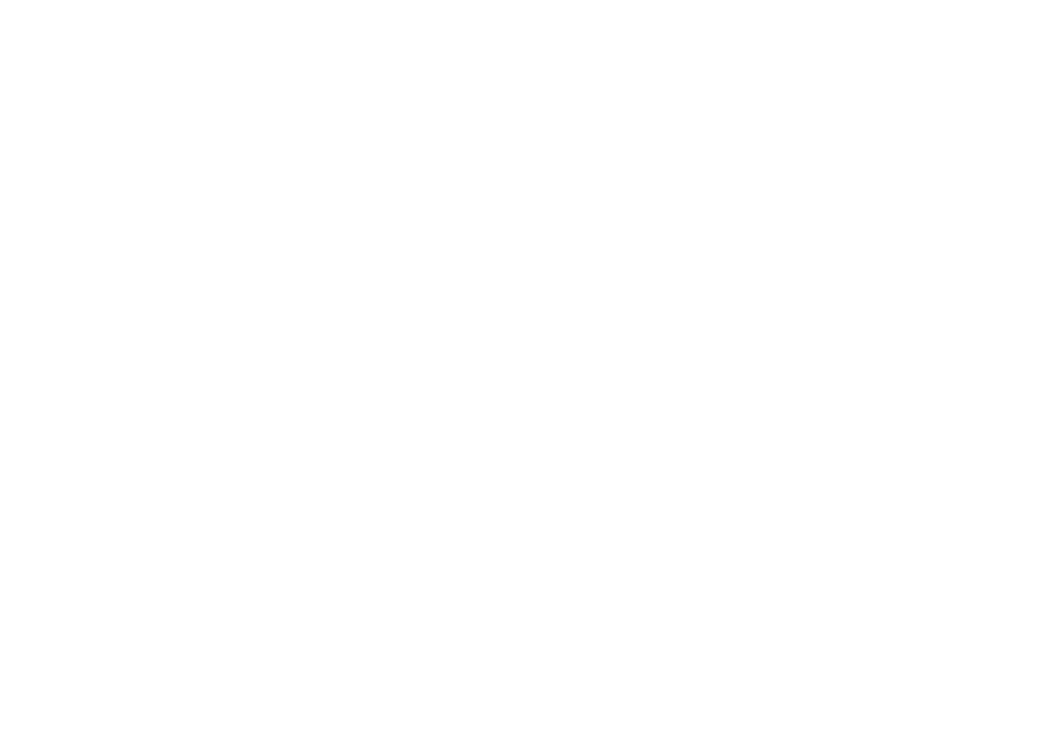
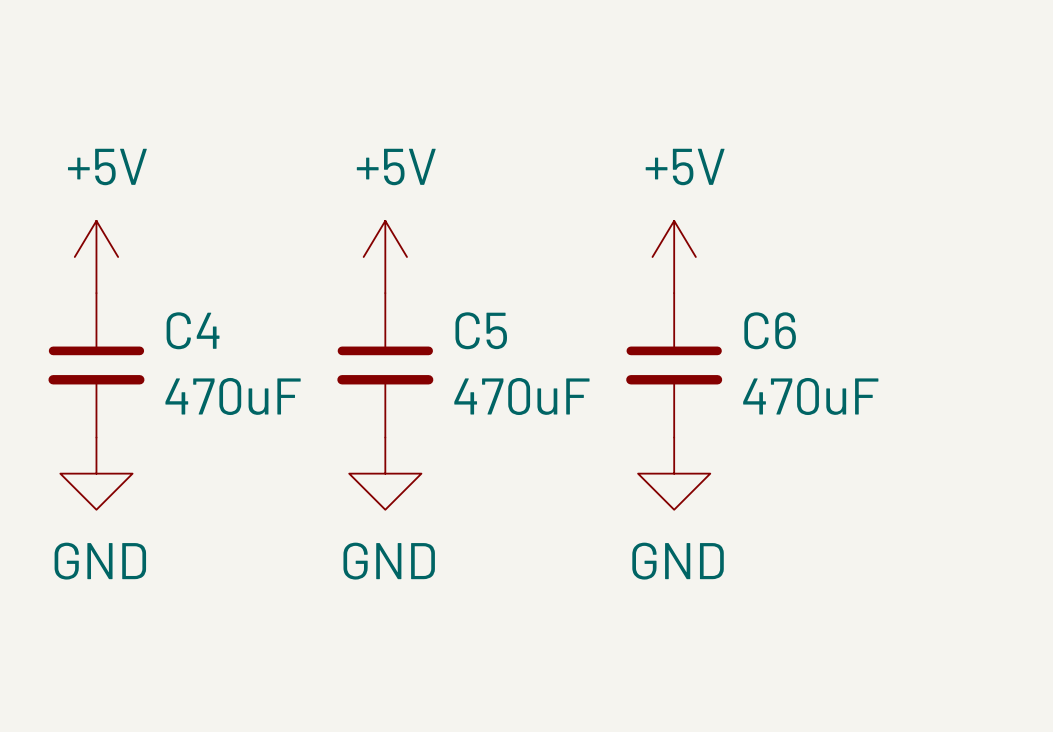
power symbol: none -> +5V (96, 256)
power symbol: none -> +5V (385, 256)
power symbol: none -> +5V (674, 256)
C4: none -> 470uF (96, 365)
C5: none -> 470uF (385, 365)
C6: none -> 470uF (674, 365)
power symbol: none -> GND (96, 473)
power symbol: none -> GND (385, 473)
power symbol: none -> GND (674, 473)

